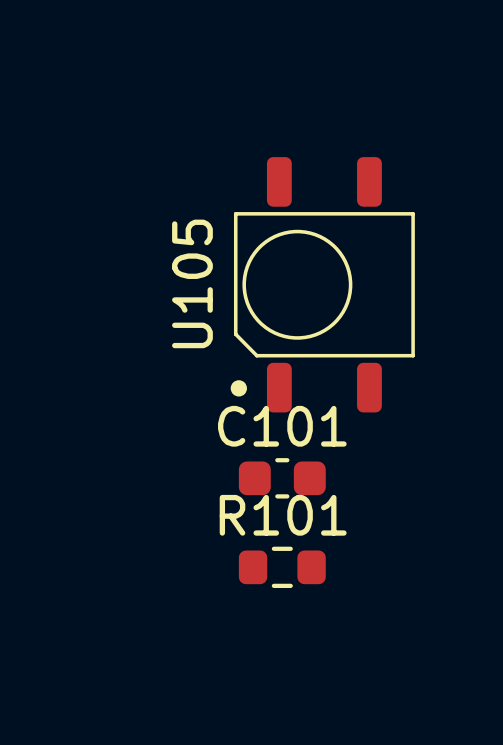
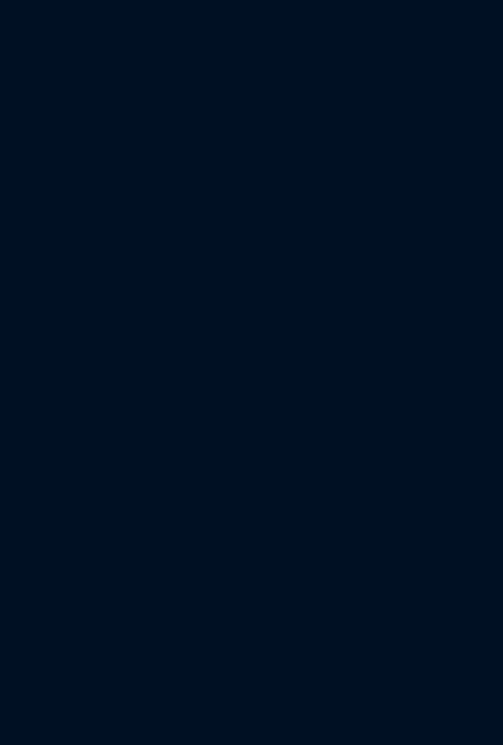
U105: (322, 284) -> none
C101: (282, 478) -> none
R101: (282, 567) -> none

